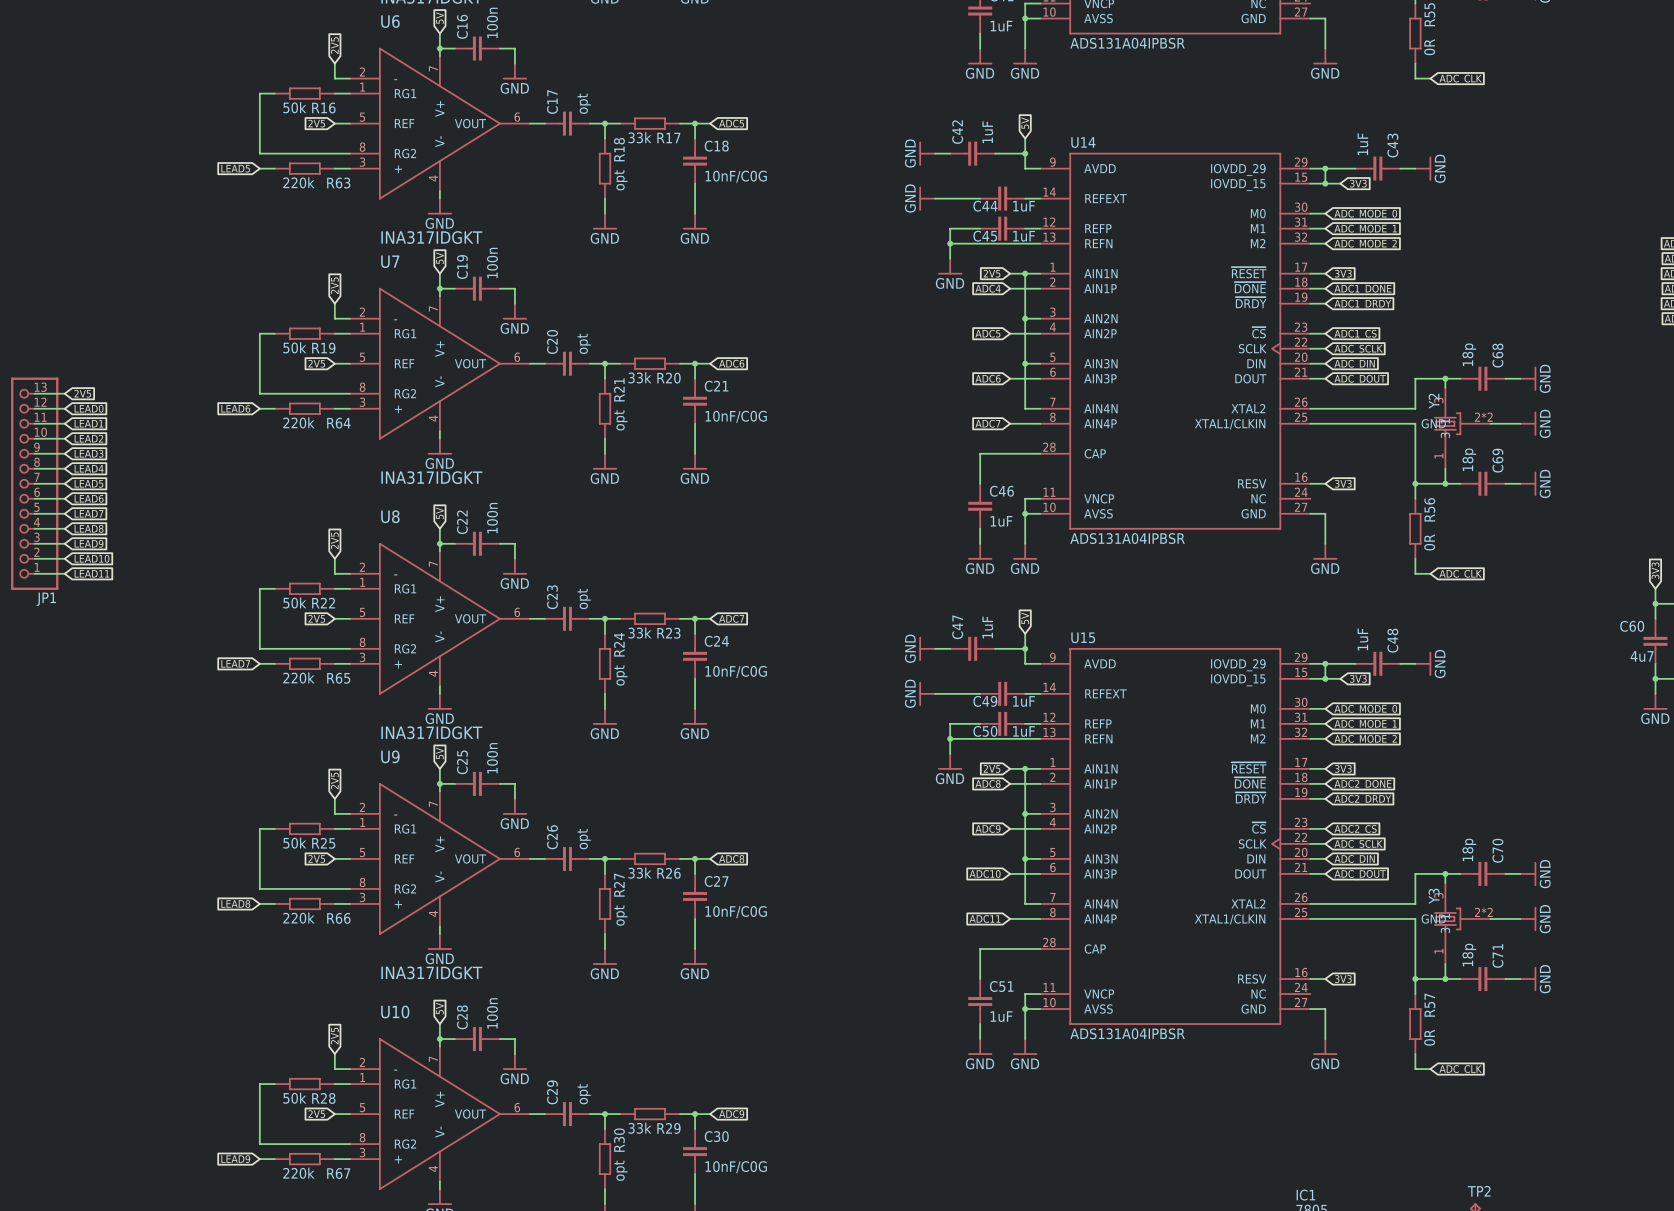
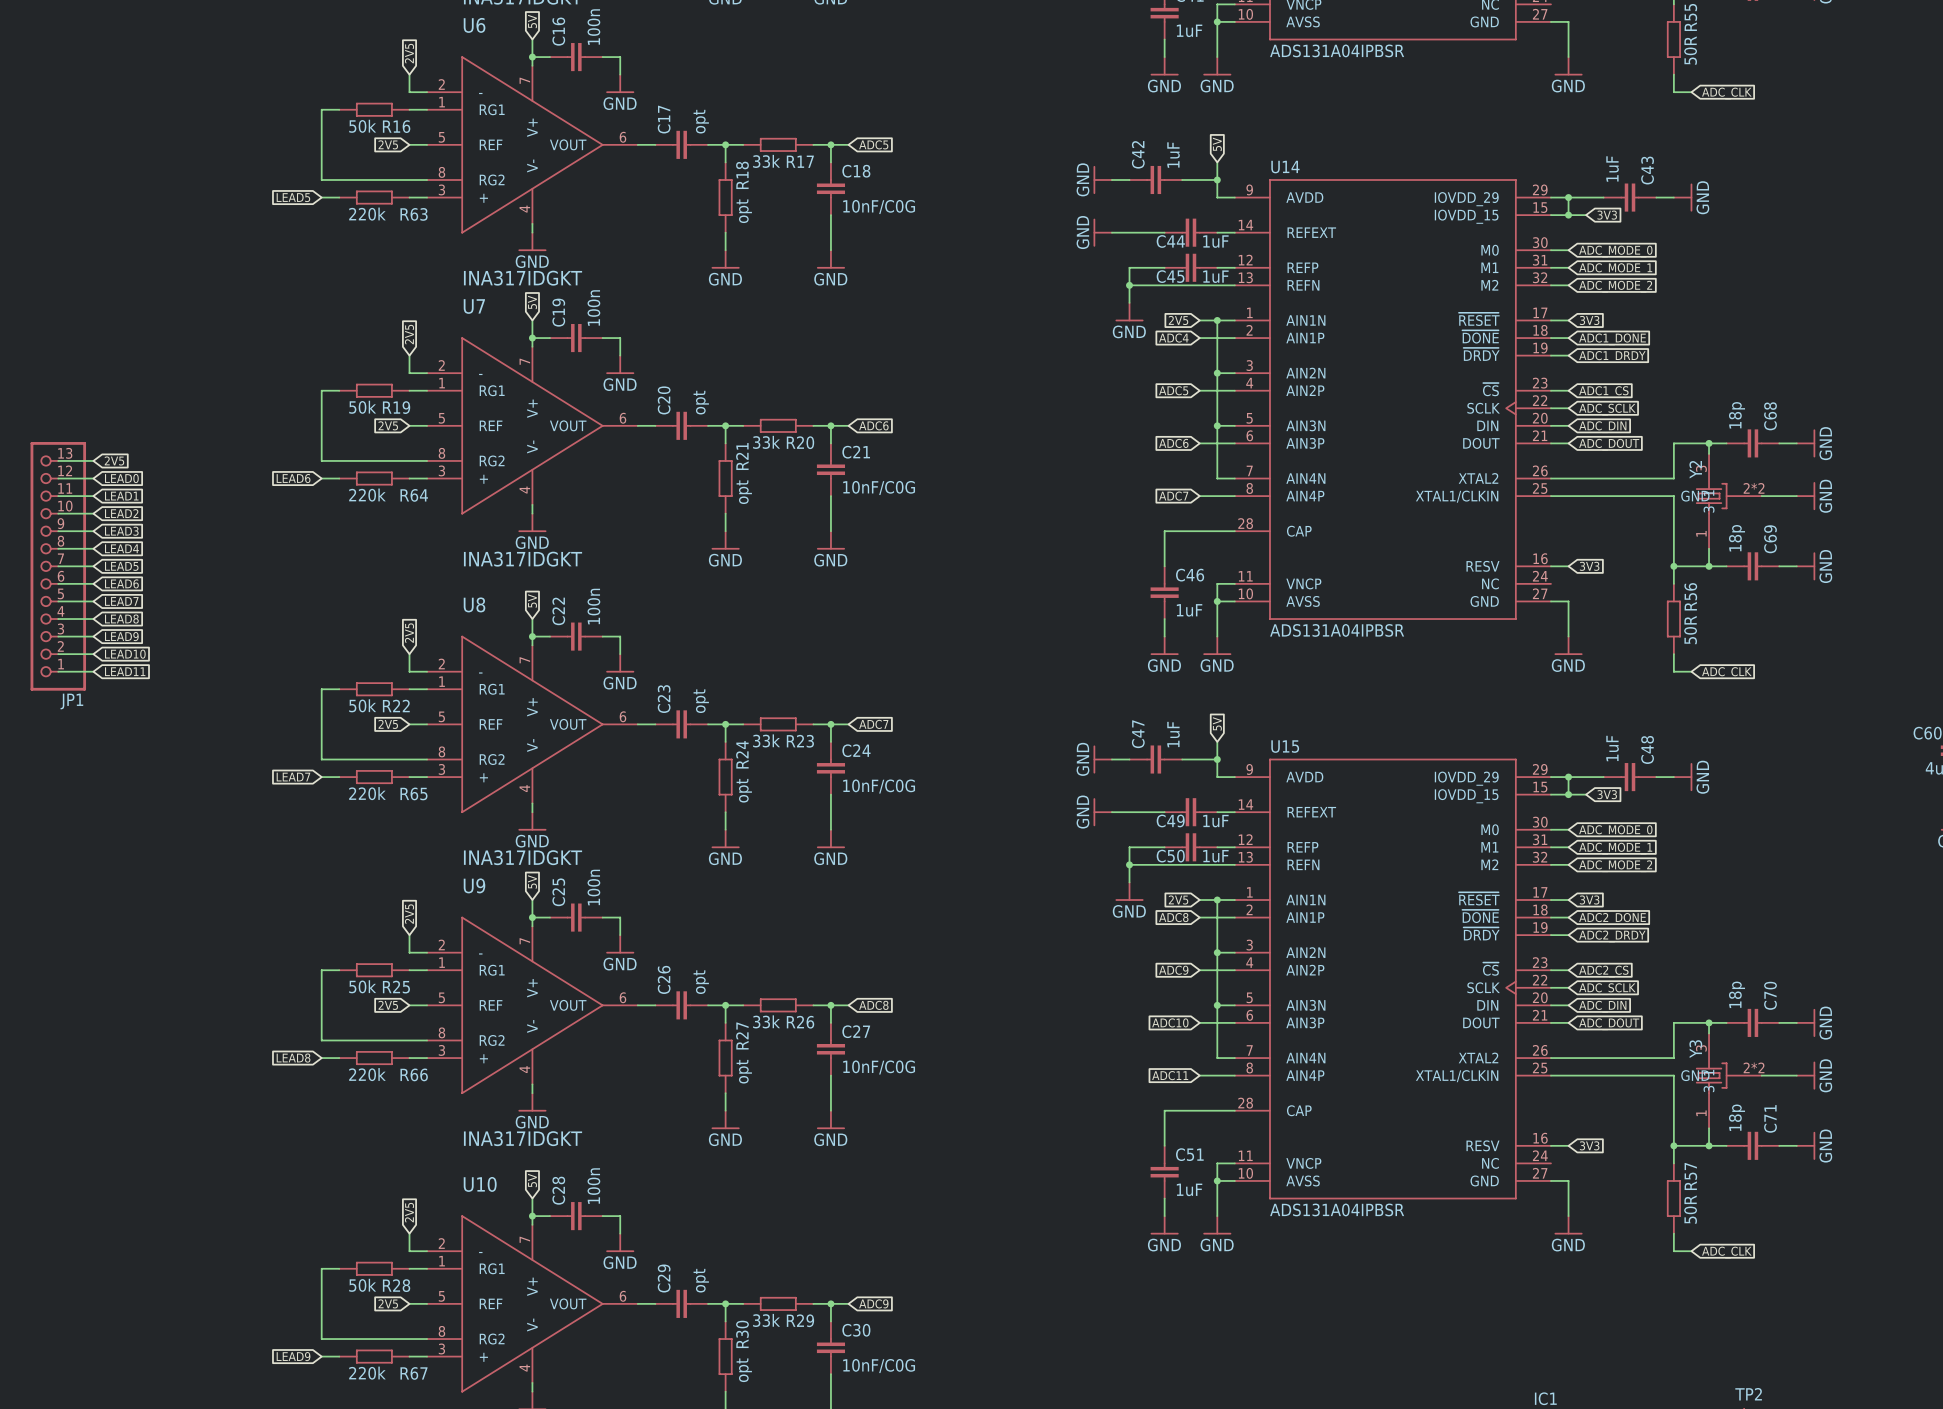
R55 value: 0R (1429, 47) -> 50R (1690, 50)
R56 value: 0R (1429, 542) -> 50R (1690, 630)
R57 value: 0R (1429, 1037) -> 50R (1690, 1209)

